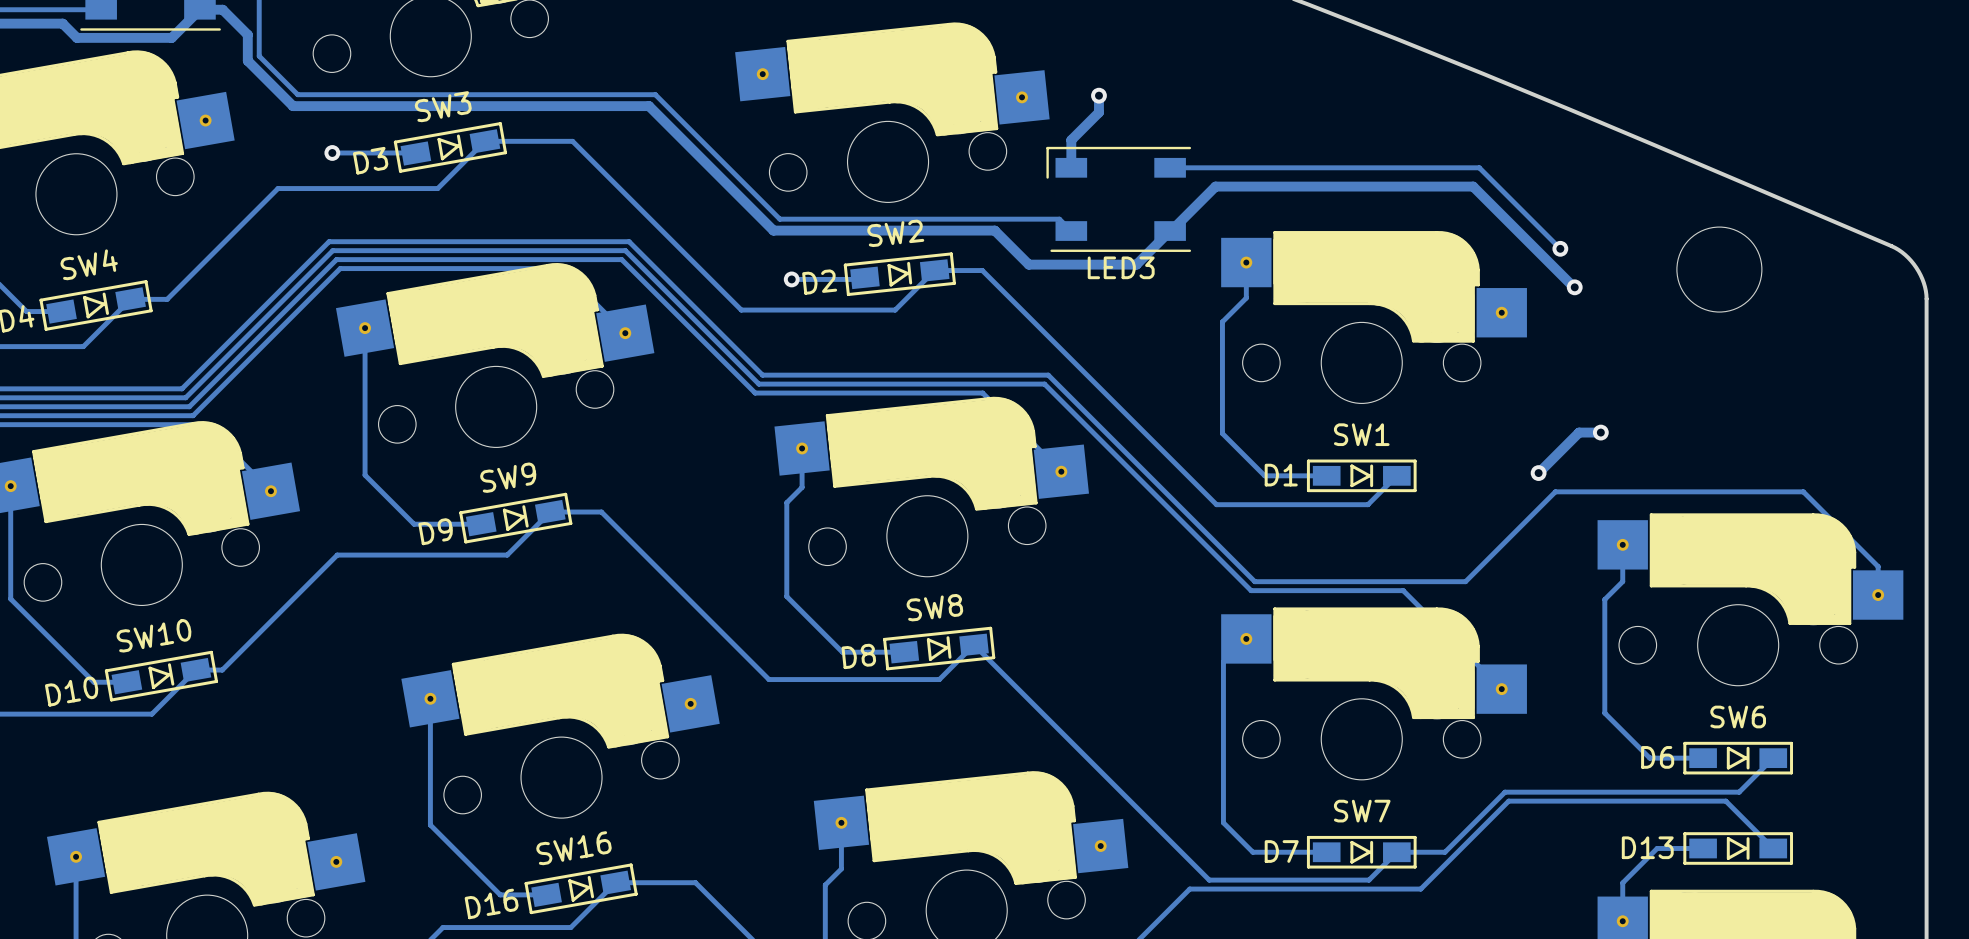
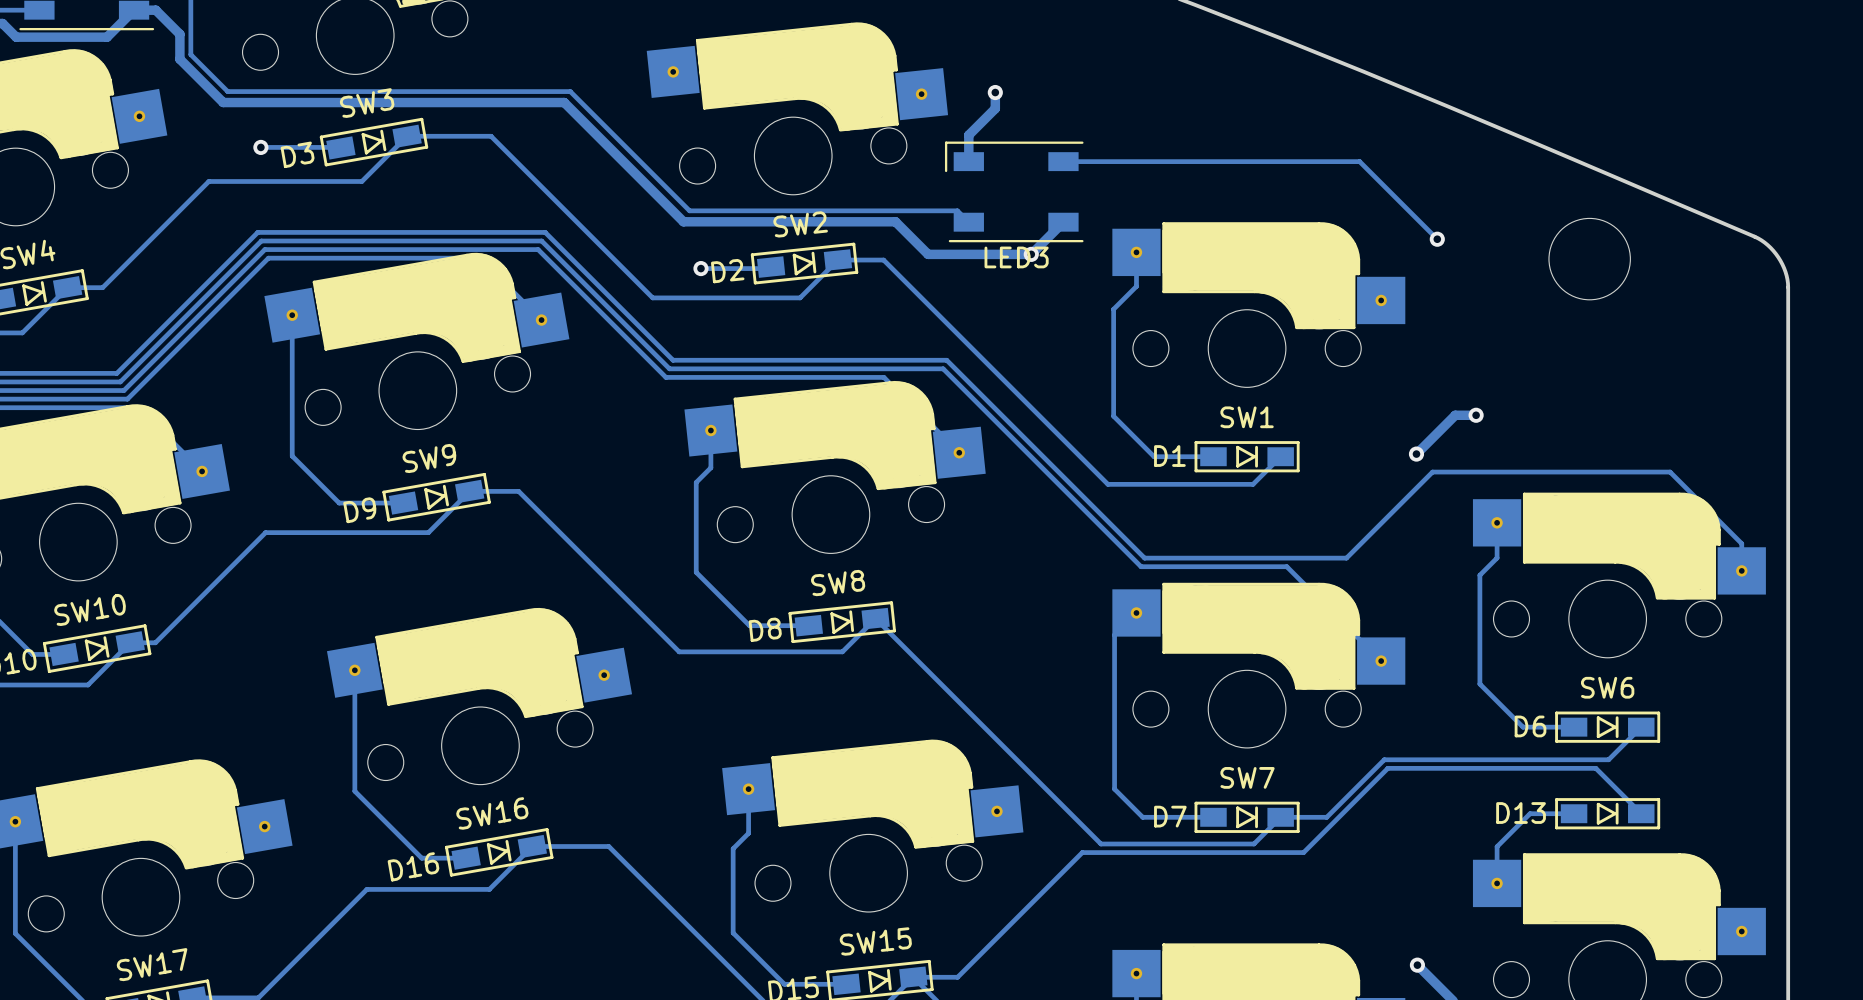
track: (1170, 231) (1215, 186) (1473, 186) (1574, 287) -> none
via: none -> (1031, 254)
via: (1574, 287) -> none

